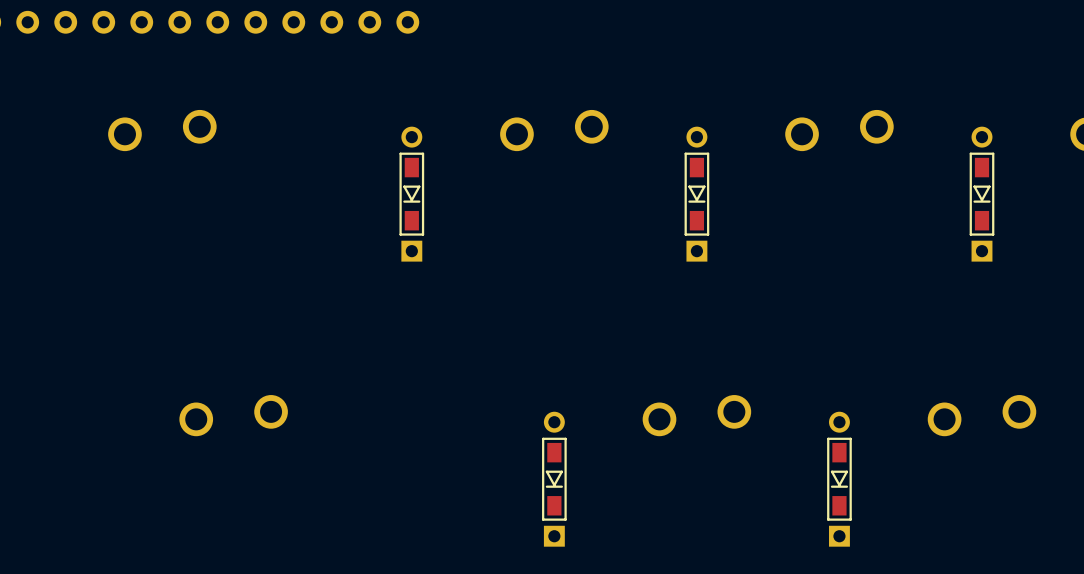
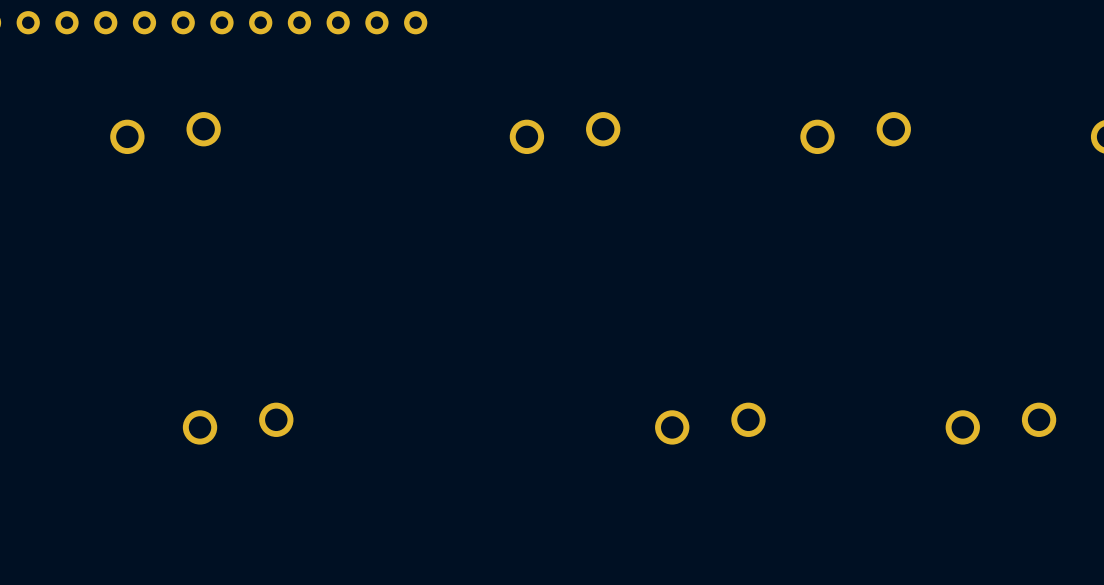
part: (411, 194) -> none
part: (696, 194) -> none
part: (982, 194) -> none
part: (554, 479) -> none
part: (839, 479) -> none

